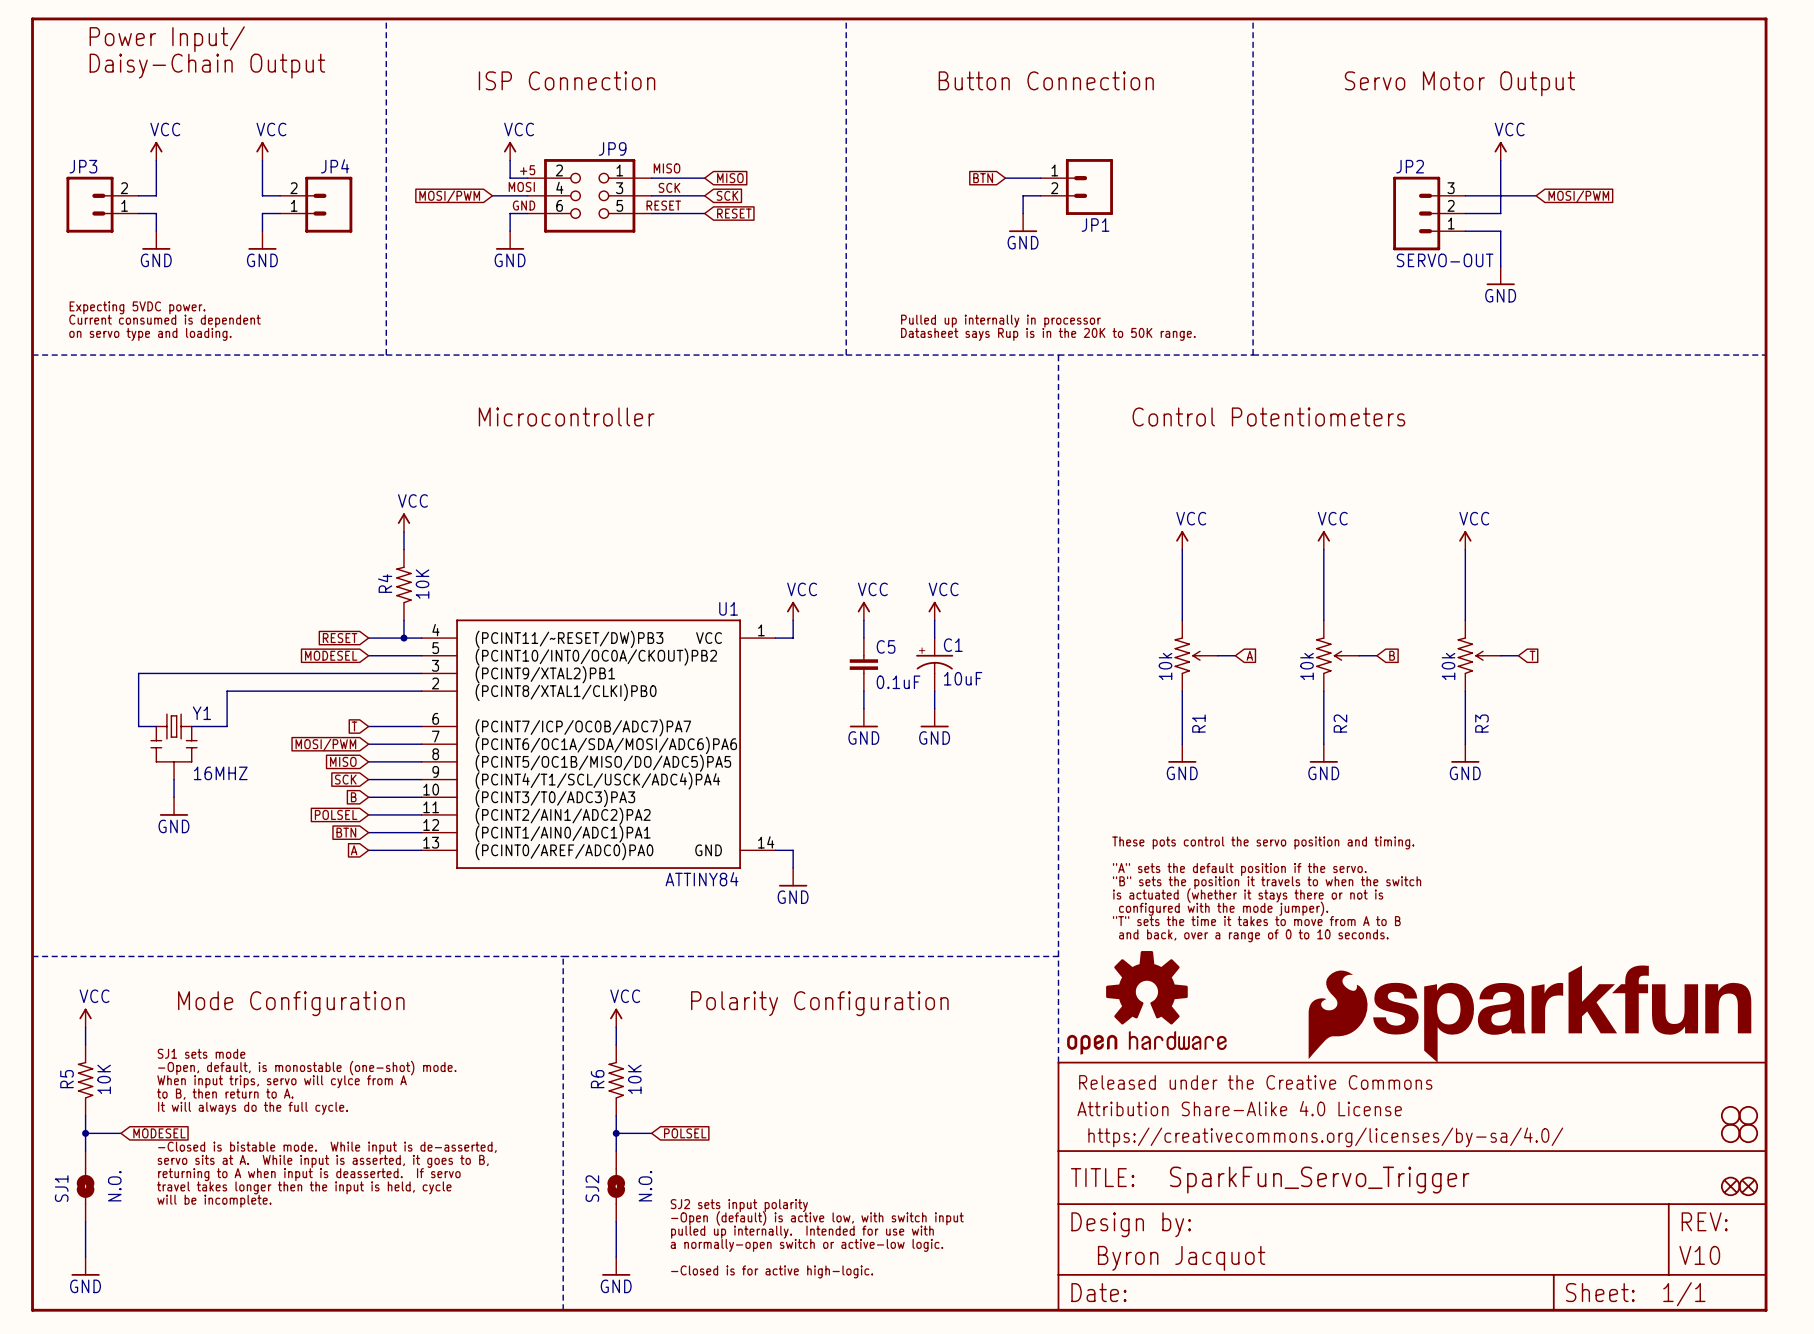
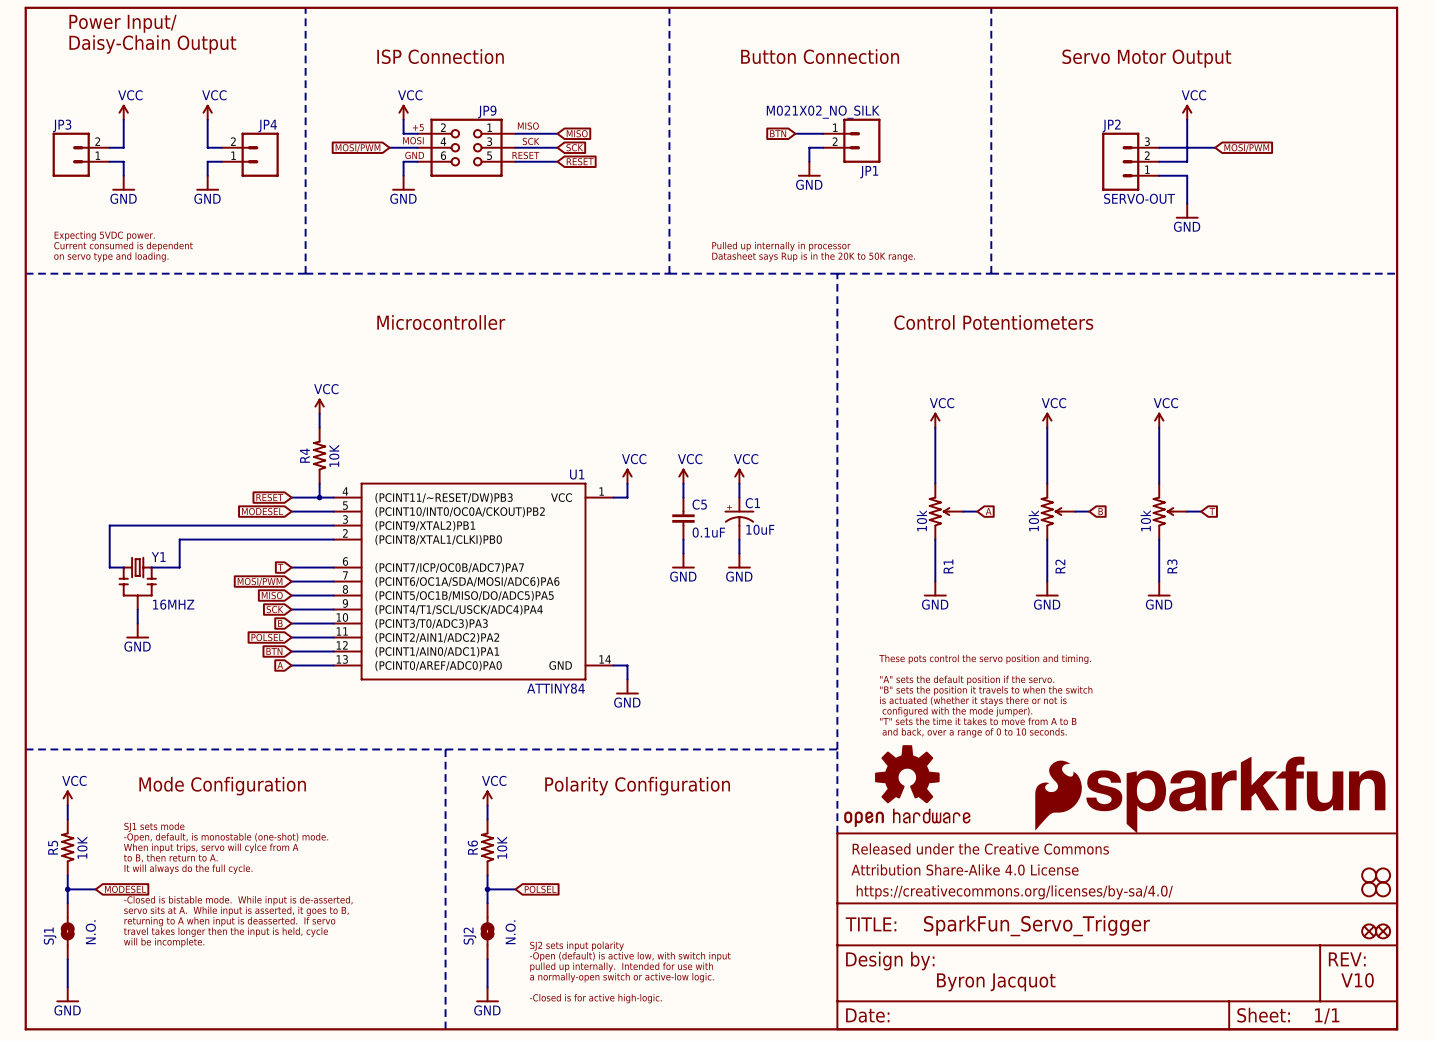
JP1 value: none -> M021X02_NO_SILK (823, 112)
text: none -> V10 (1357, 980)
text: none -> Byron Jacquot (996, 982)
part text: V10 (1699, 1255) -> none
part text: Byron Jacquot (1181, 1258) -> none

